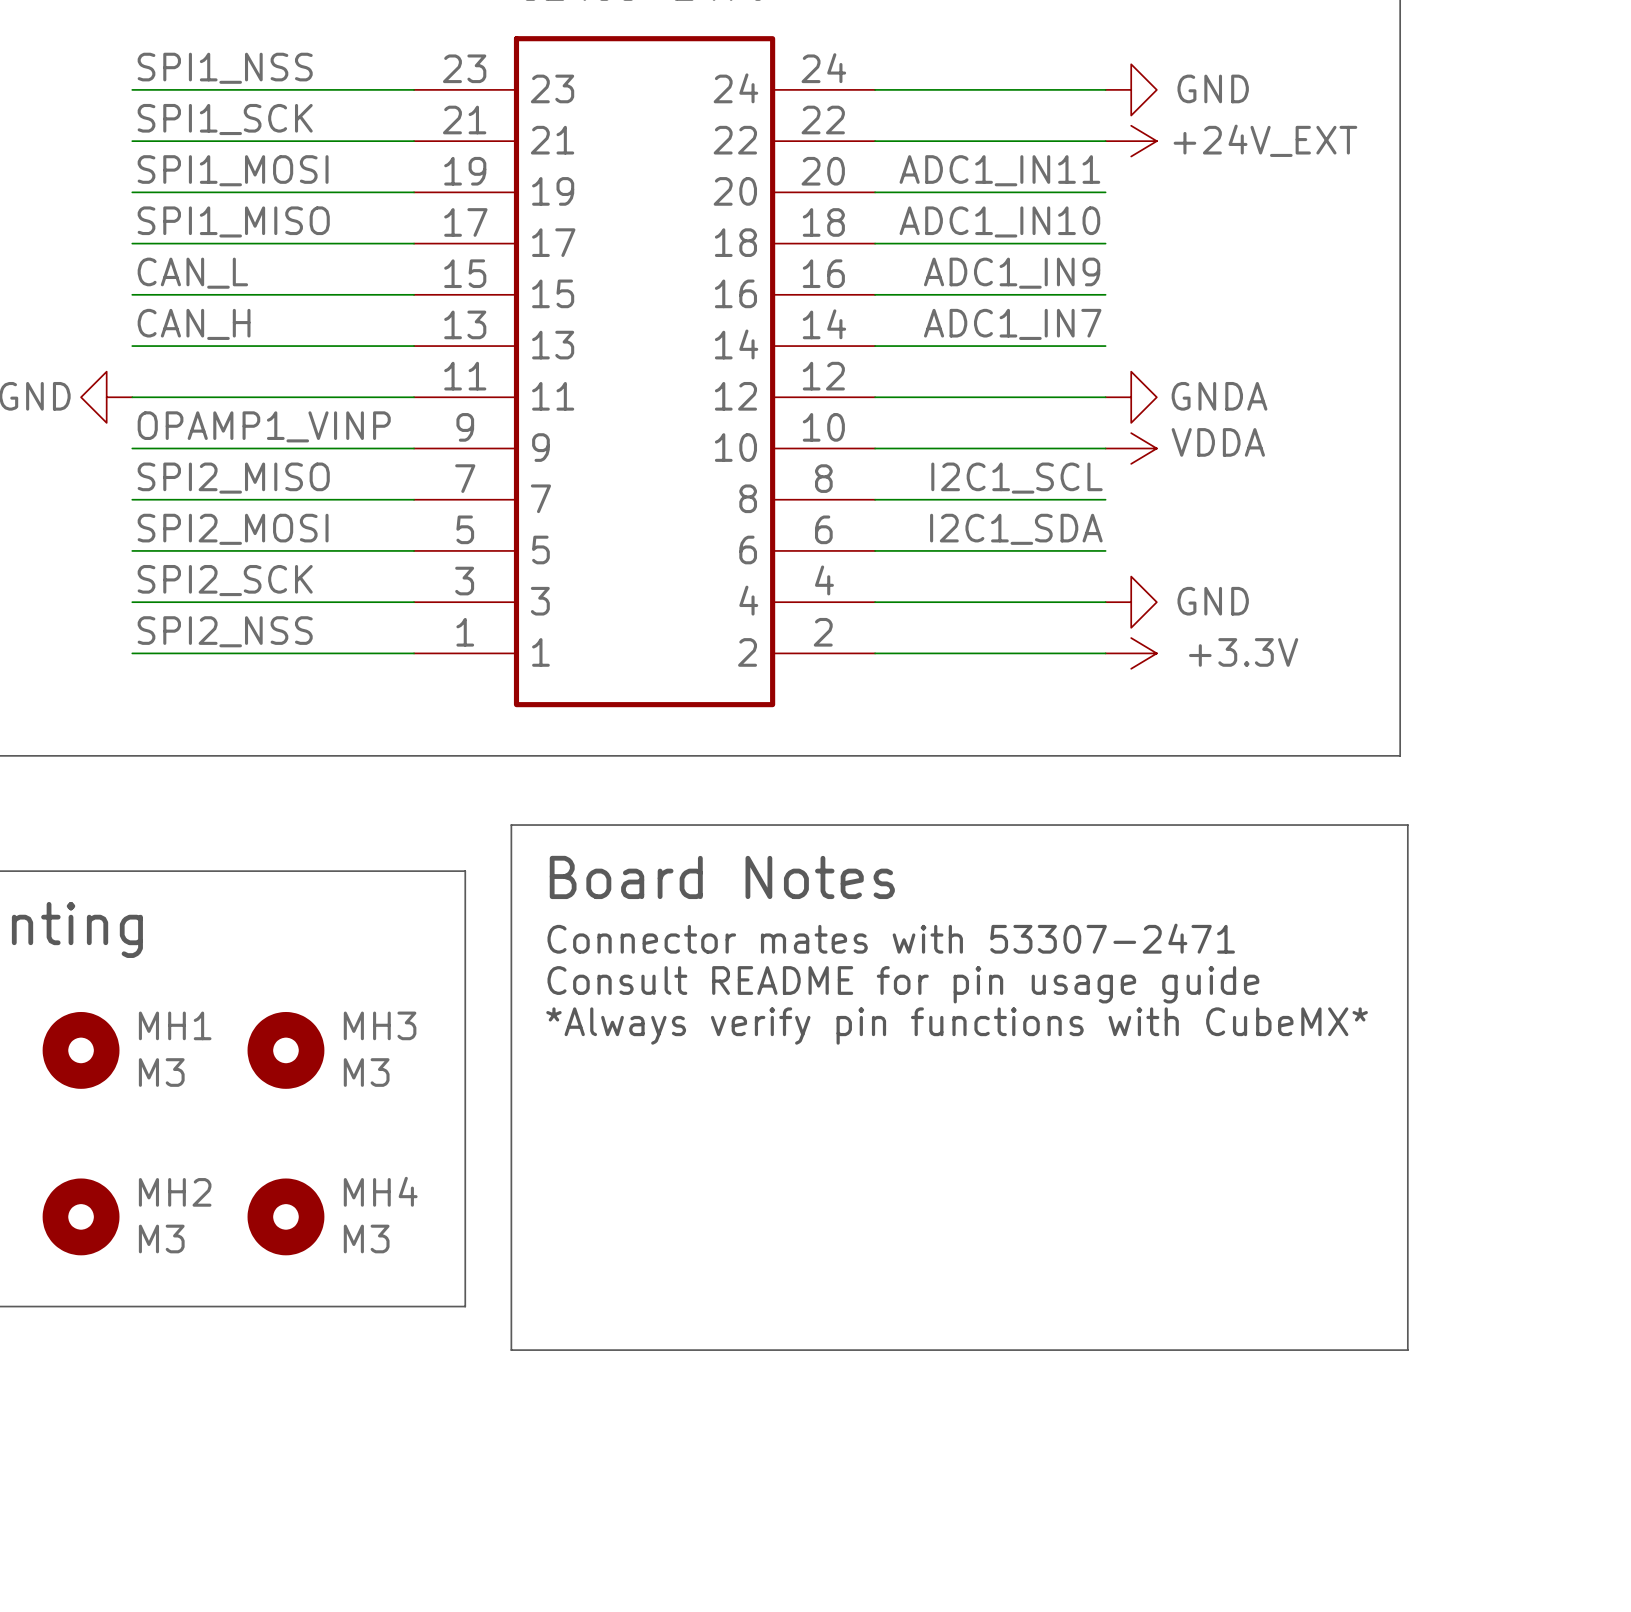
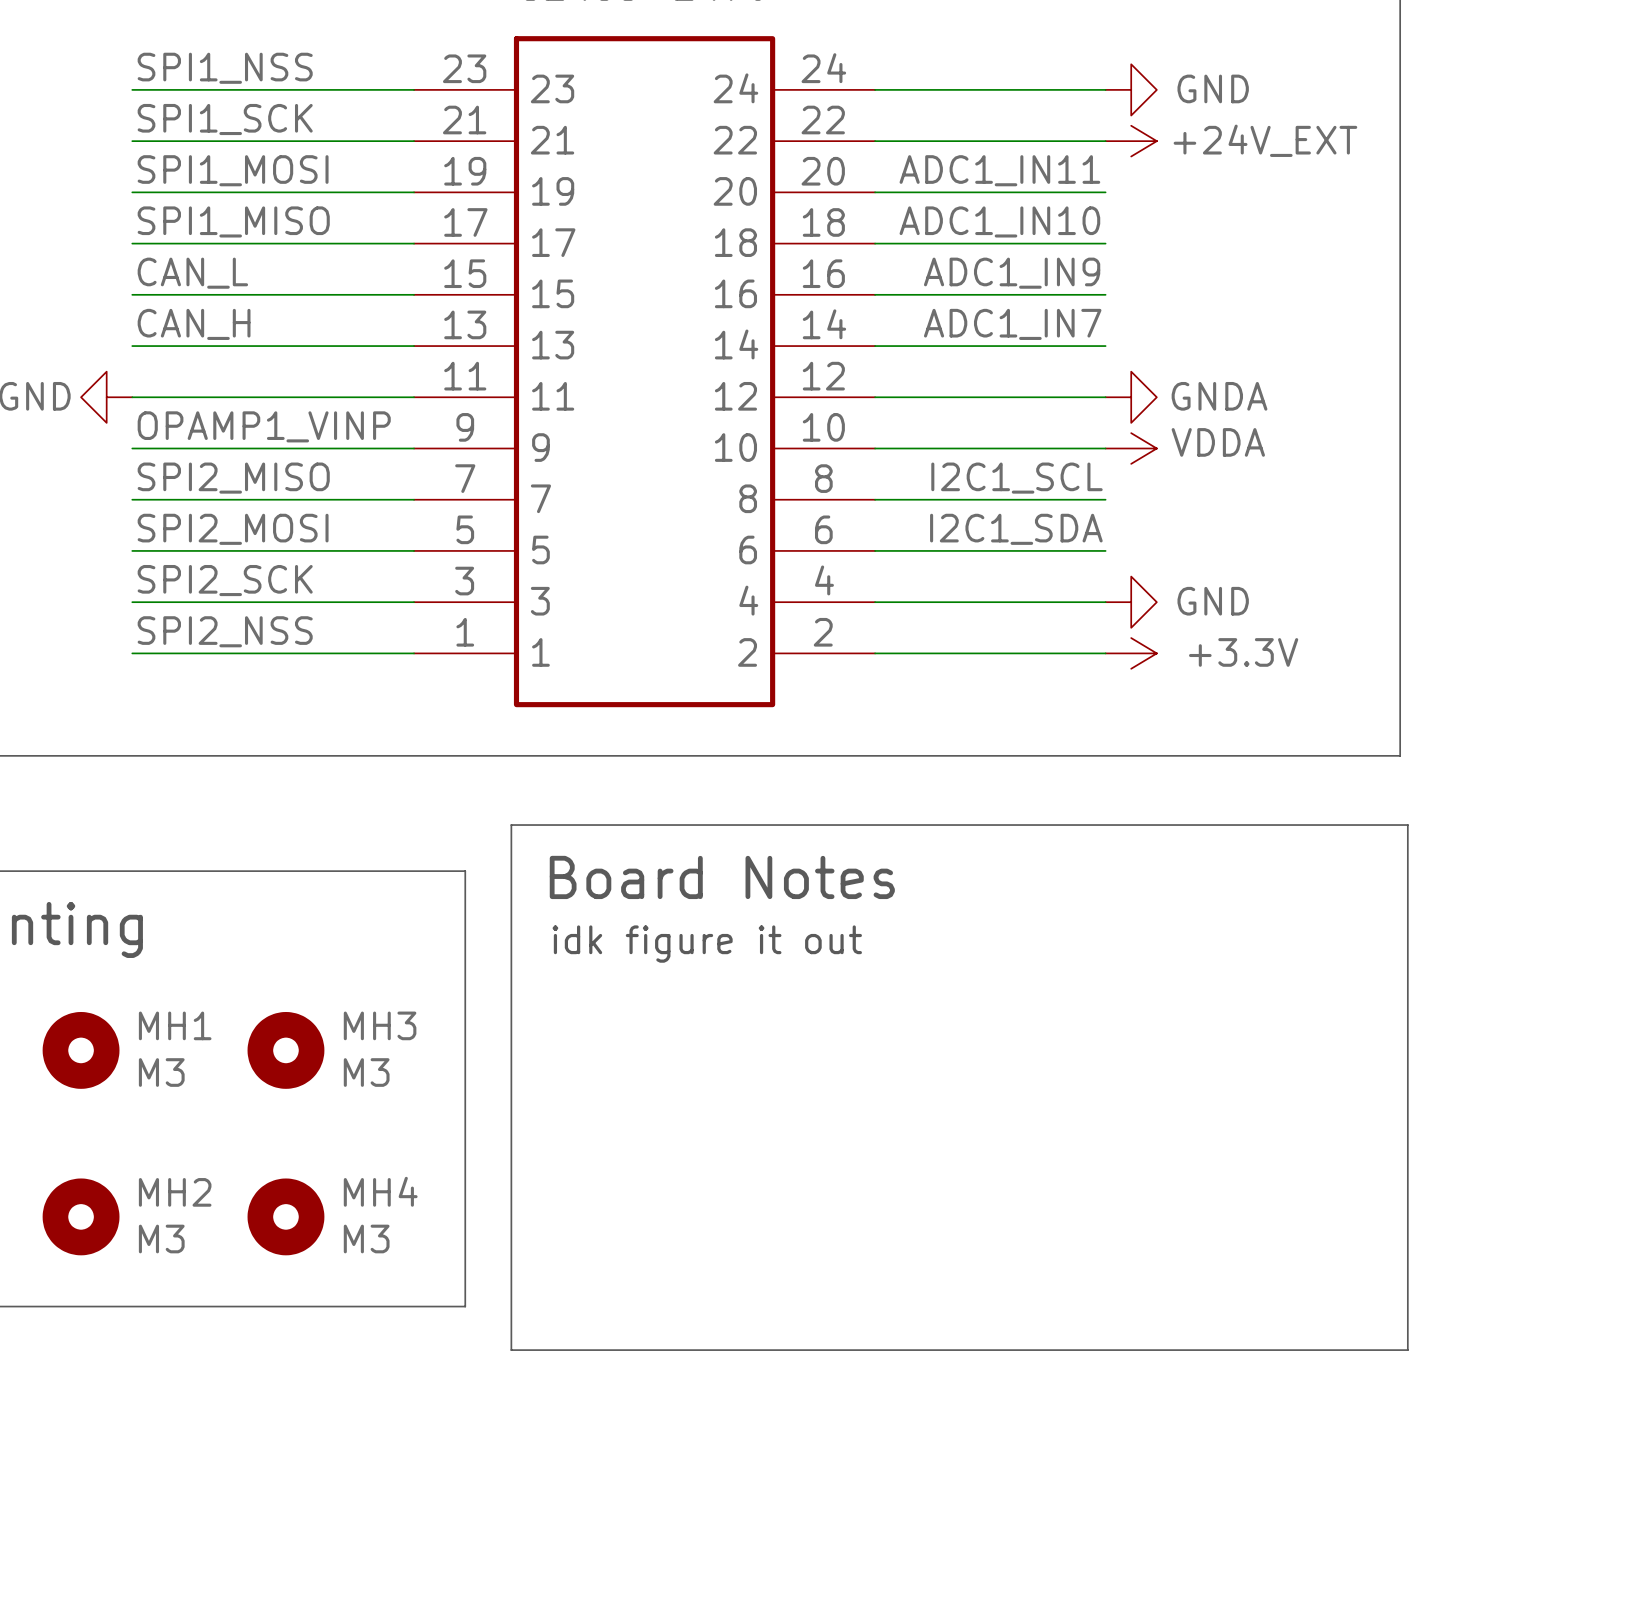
text: Connector mates with 53307-2471 (891, 938) -> idk figure it out (707, 944)
text: Consult README for pin usage guide (903, 984) -> none
text: *Always verify pin functions with CubeMX* (957, 1026) -> none

